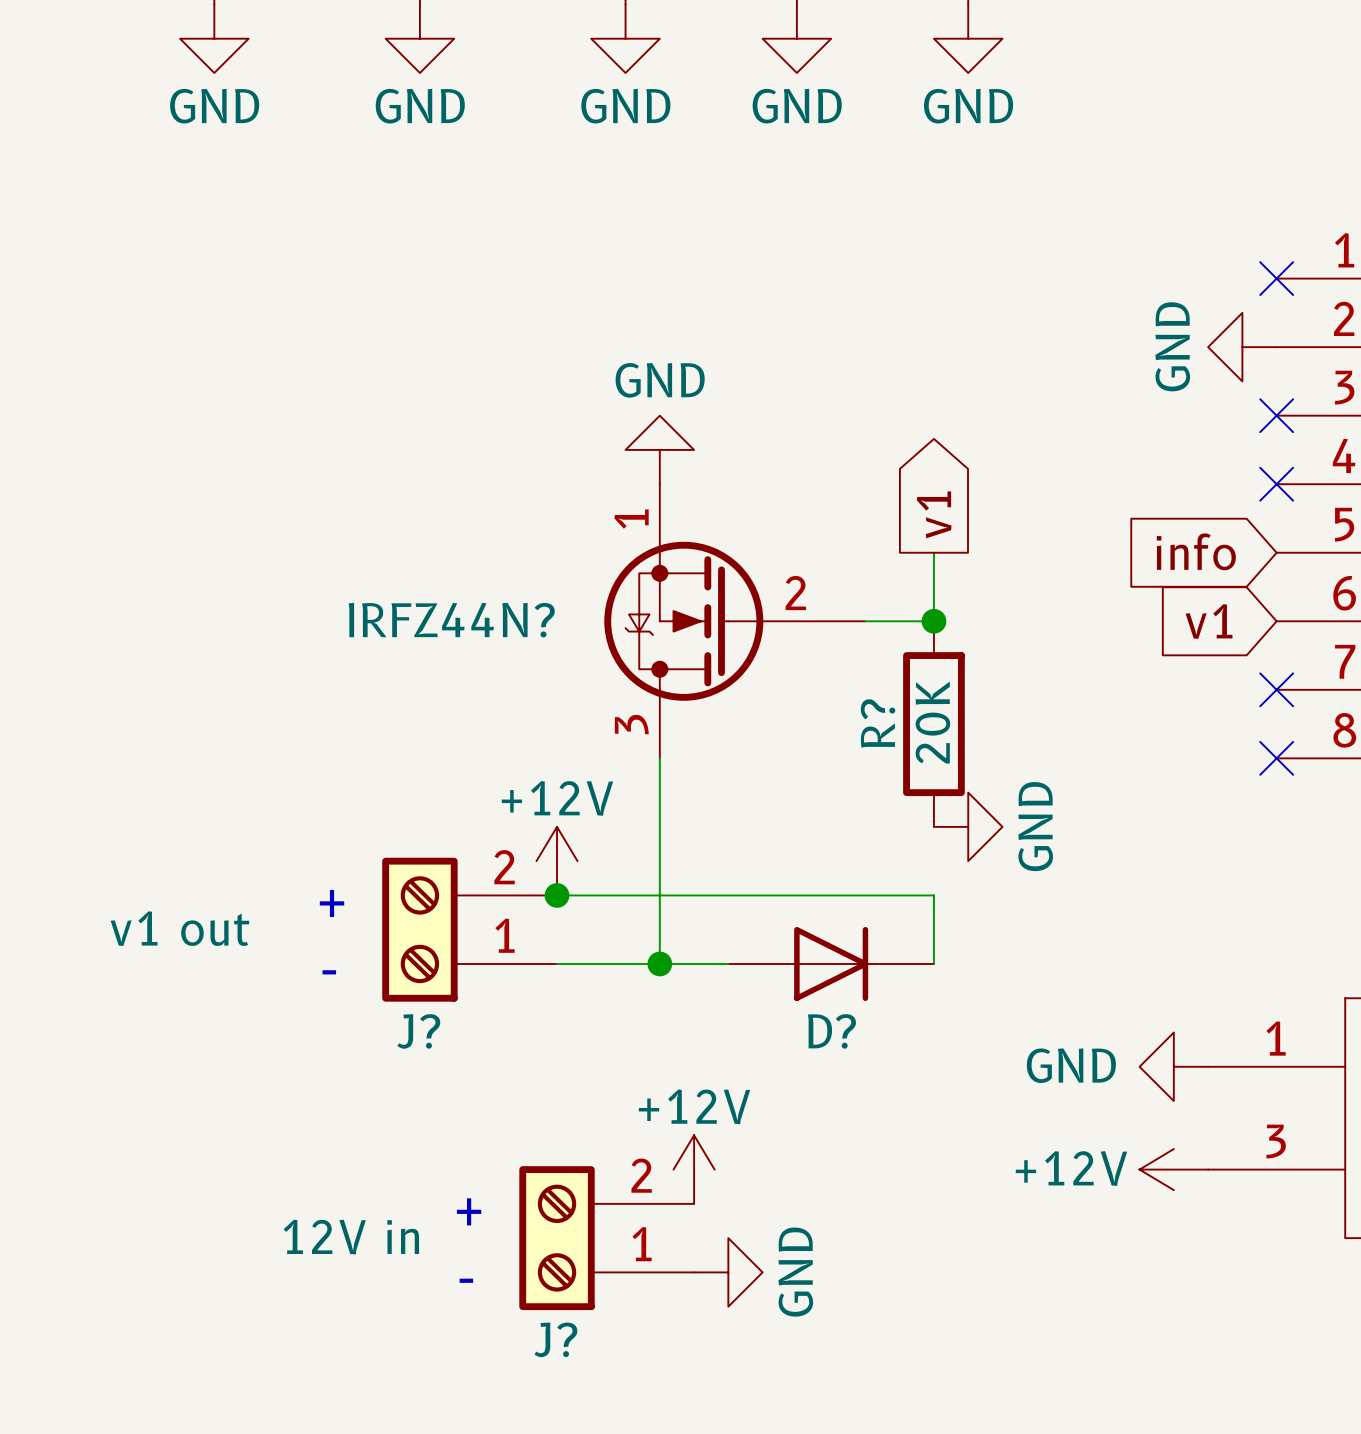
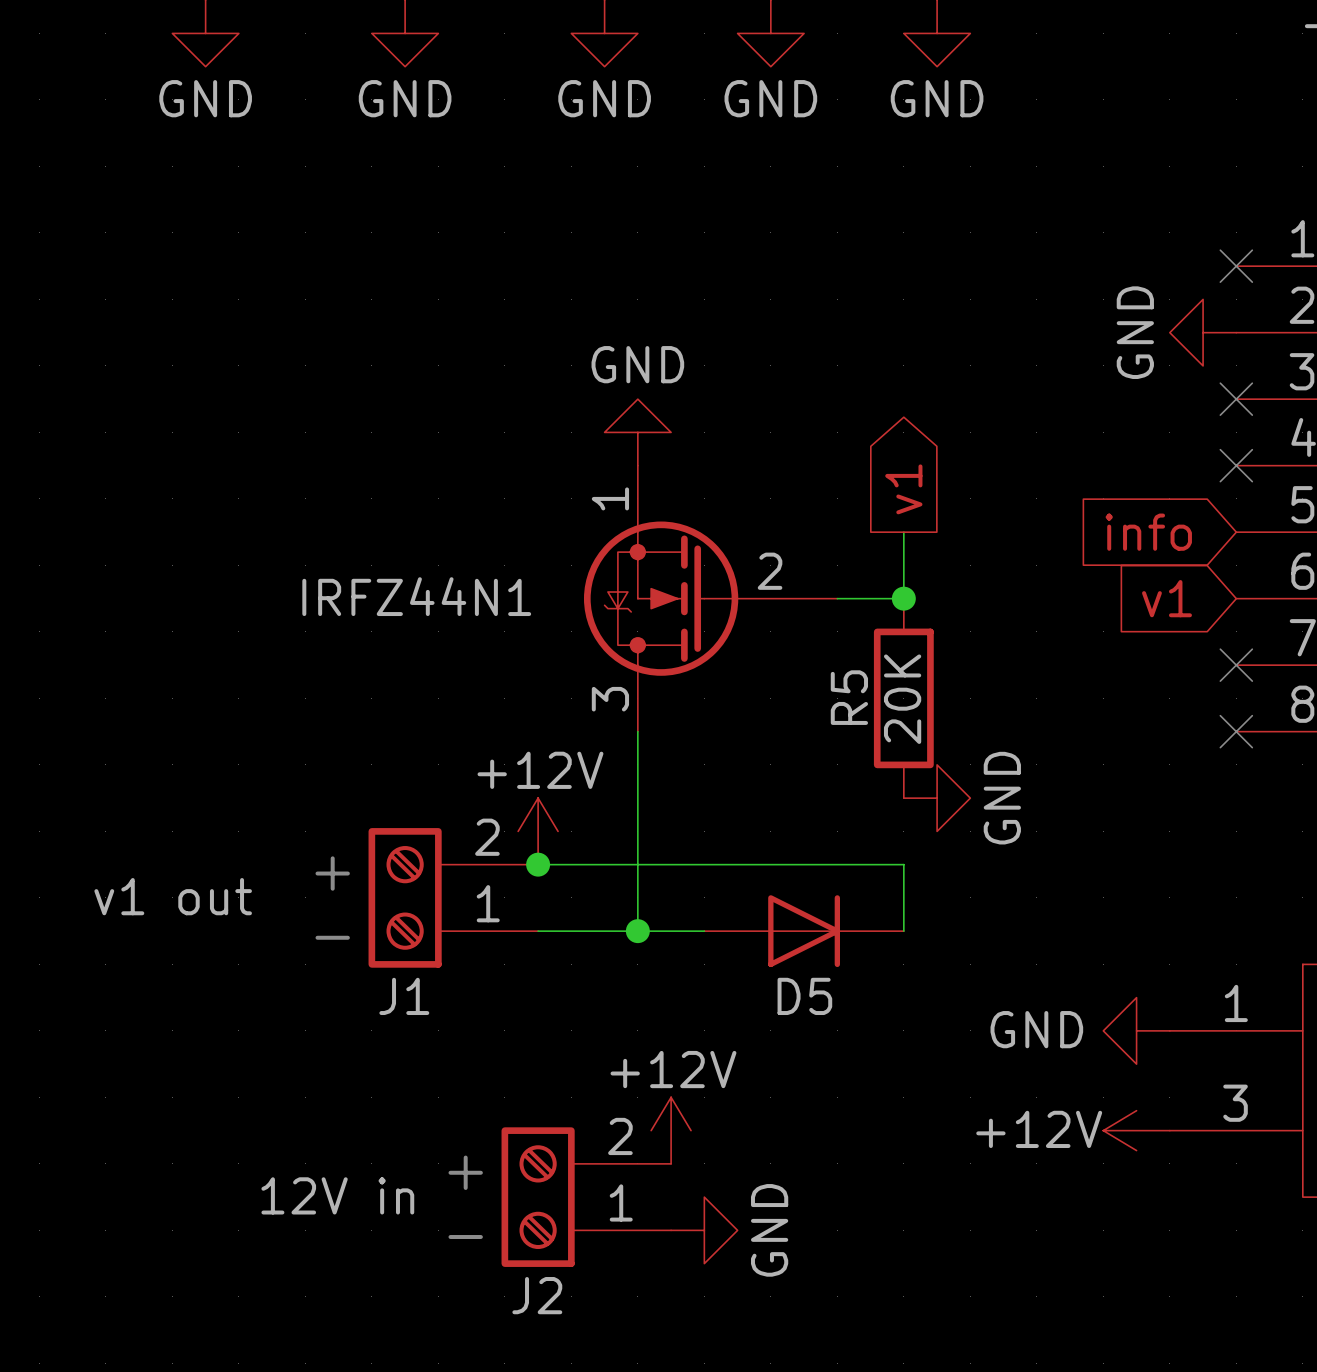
IRFZ44N? name: IRFZ44N? (451, 620) -> IRFZ44N1 (416, 596)
R? name: R? (878, 723) -> R5 (849, 697)
J? name: J? (418, 1031) -> J1 (404, 996)
D? name: D? (831, 1031) -> D5 (804, 996)
J? name: J? (555, 1339) -> J2 (537, 1295)

